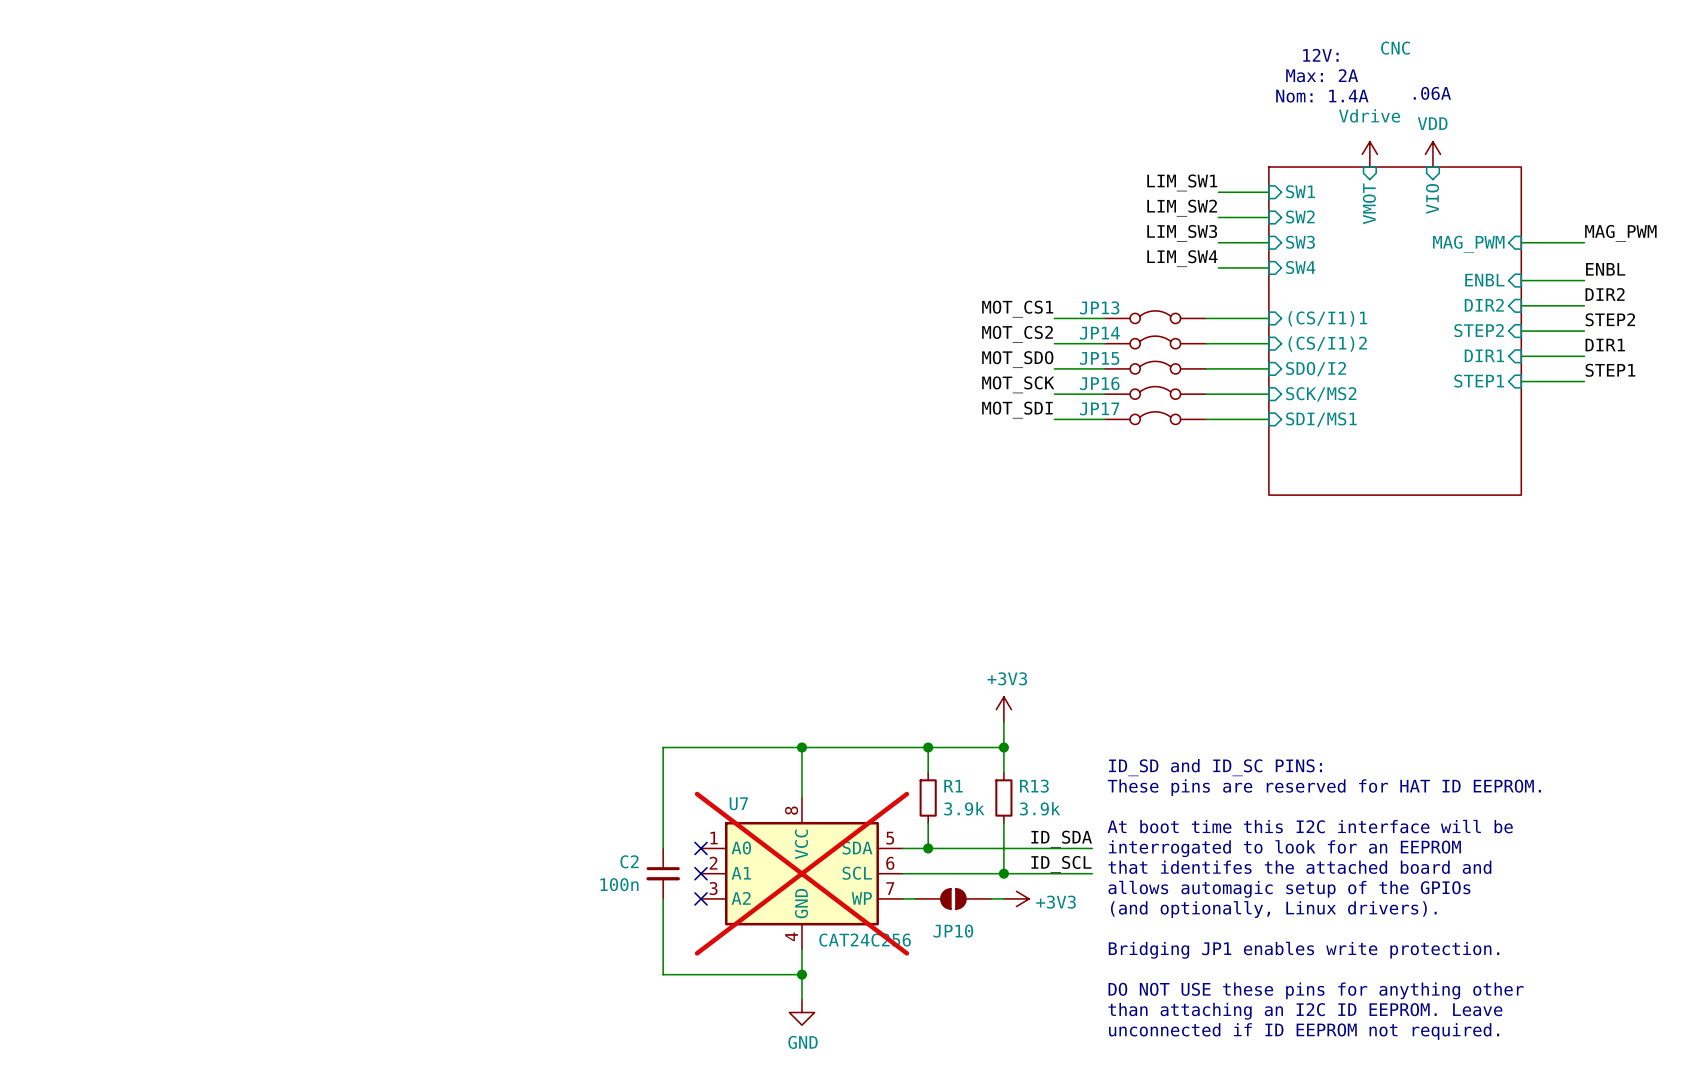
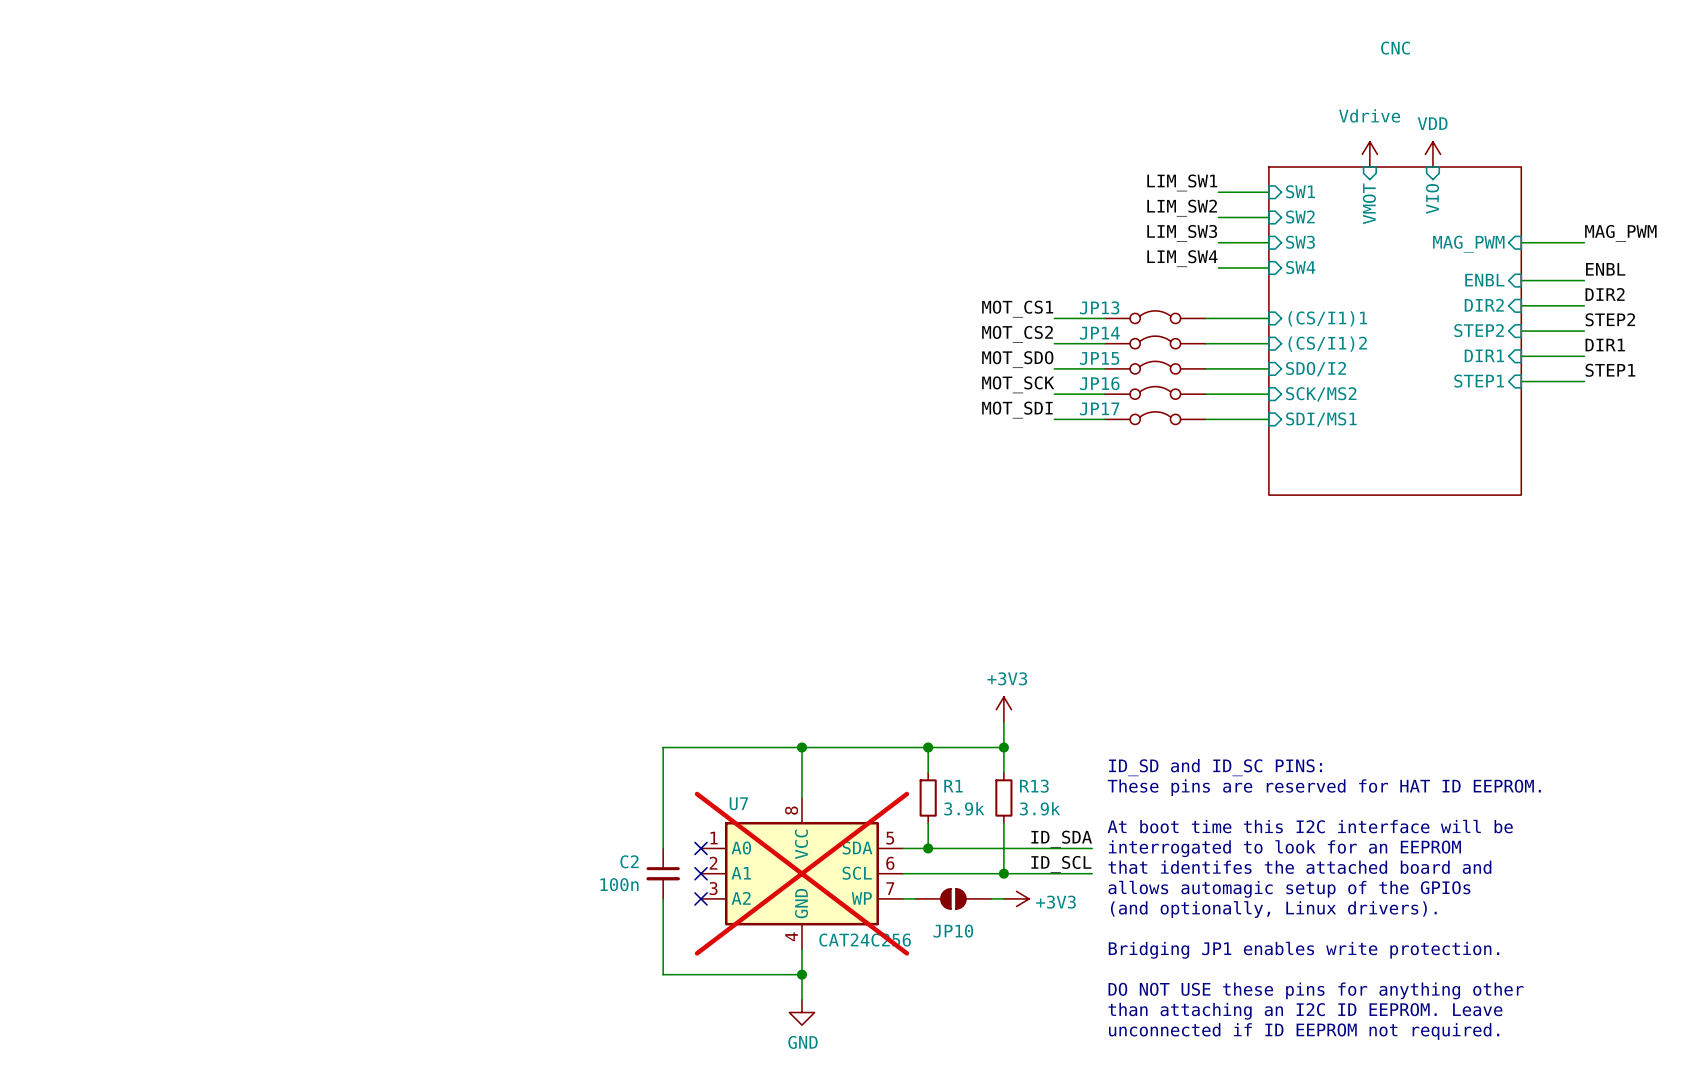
text: 12V: (1320, 55) -> none
text: Max: 2A (1322, 75) -> none
text: .06A (1432, 93) -> none
text: Nom: 1.4A (1322, 96) -> none

